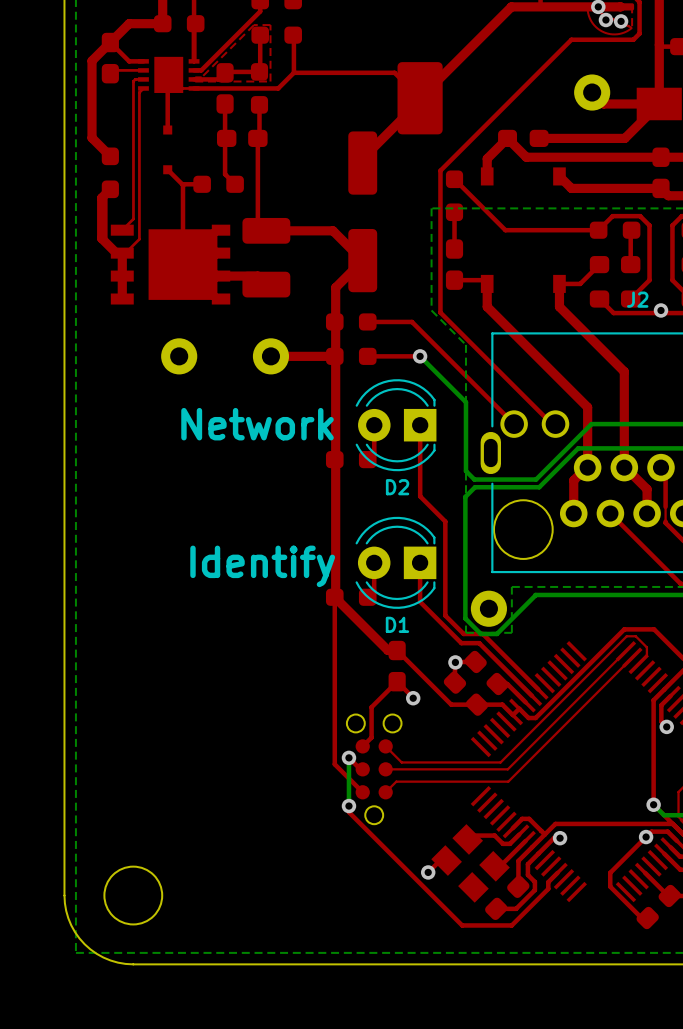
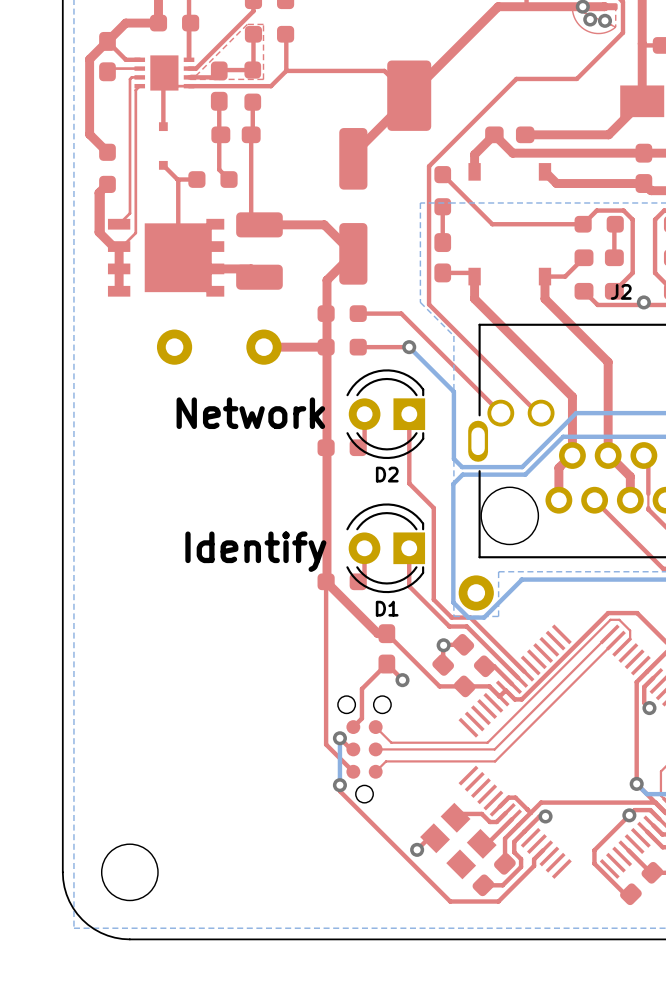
top track: (633, 39) (571, 39) (530, 81) -> (617, 38) (576, 78) (516, 78)
top track: (592, 92) (603, 103) (659, 103) -> none
part: (592, 92) -> none

